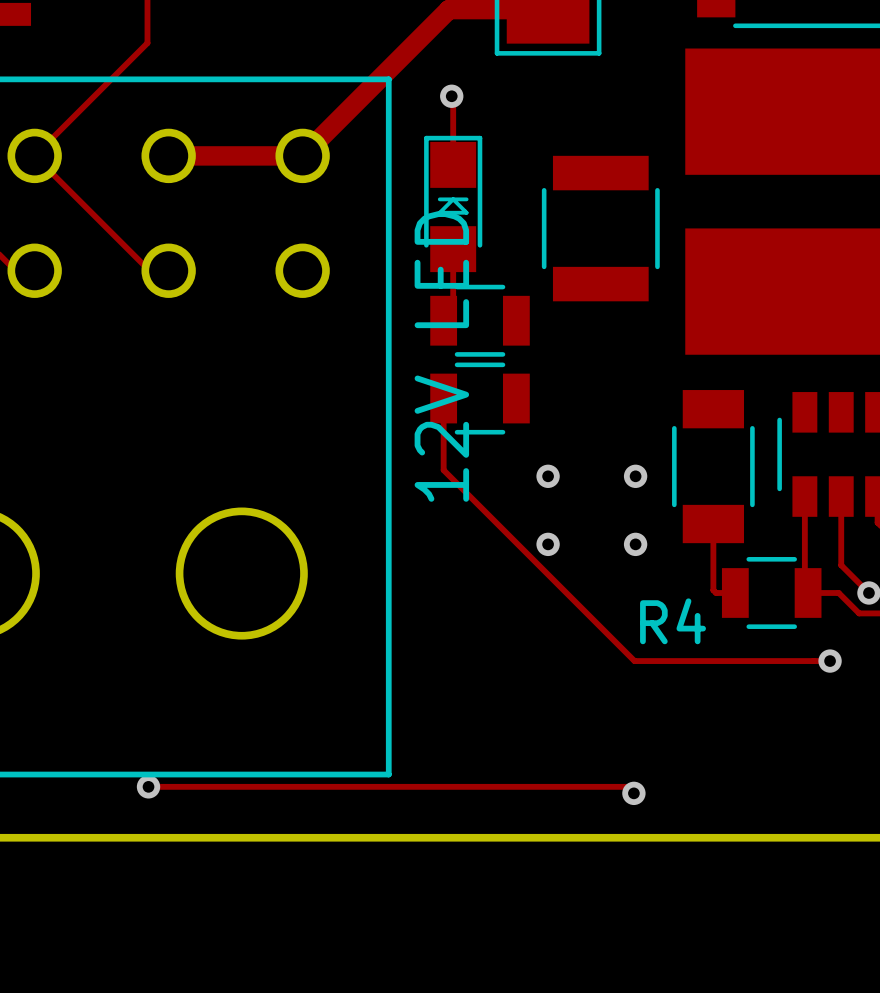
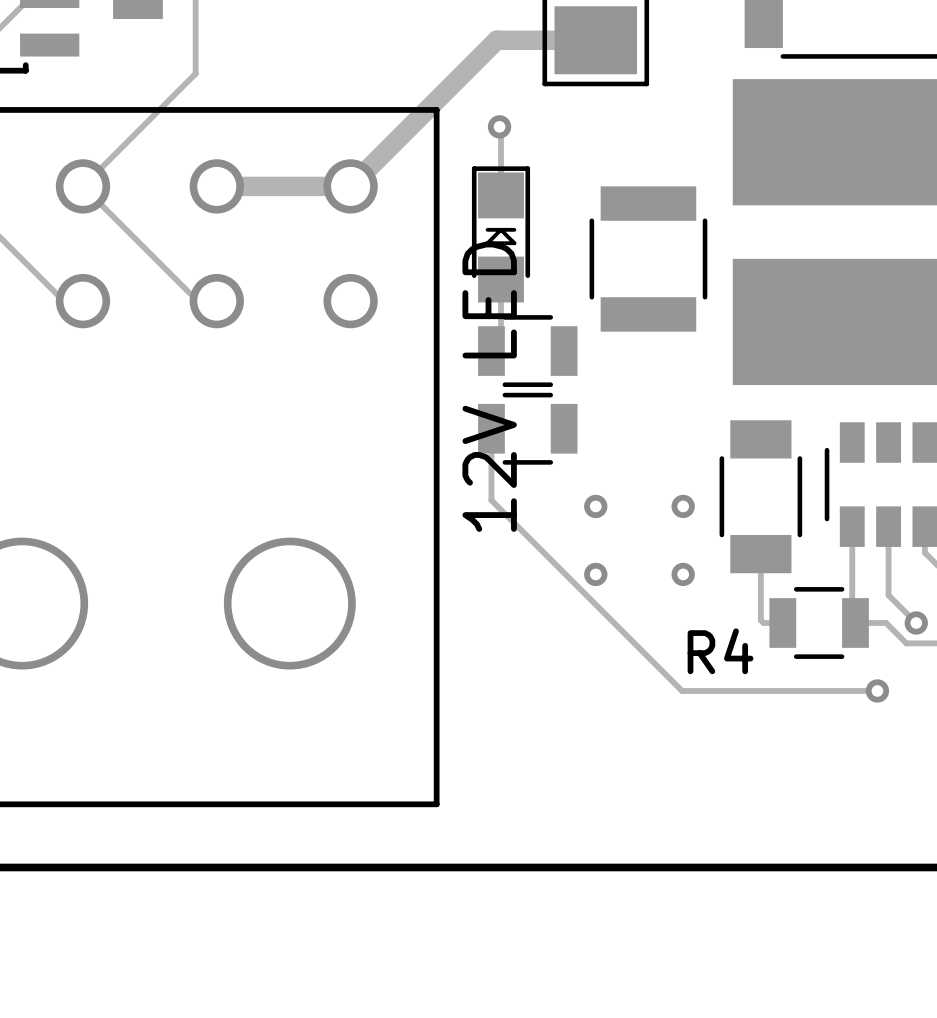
track: (148, 786) (627, 786) (633, 793) -> none
via: (148, 786) -> none
via: (633, 793) -> none

